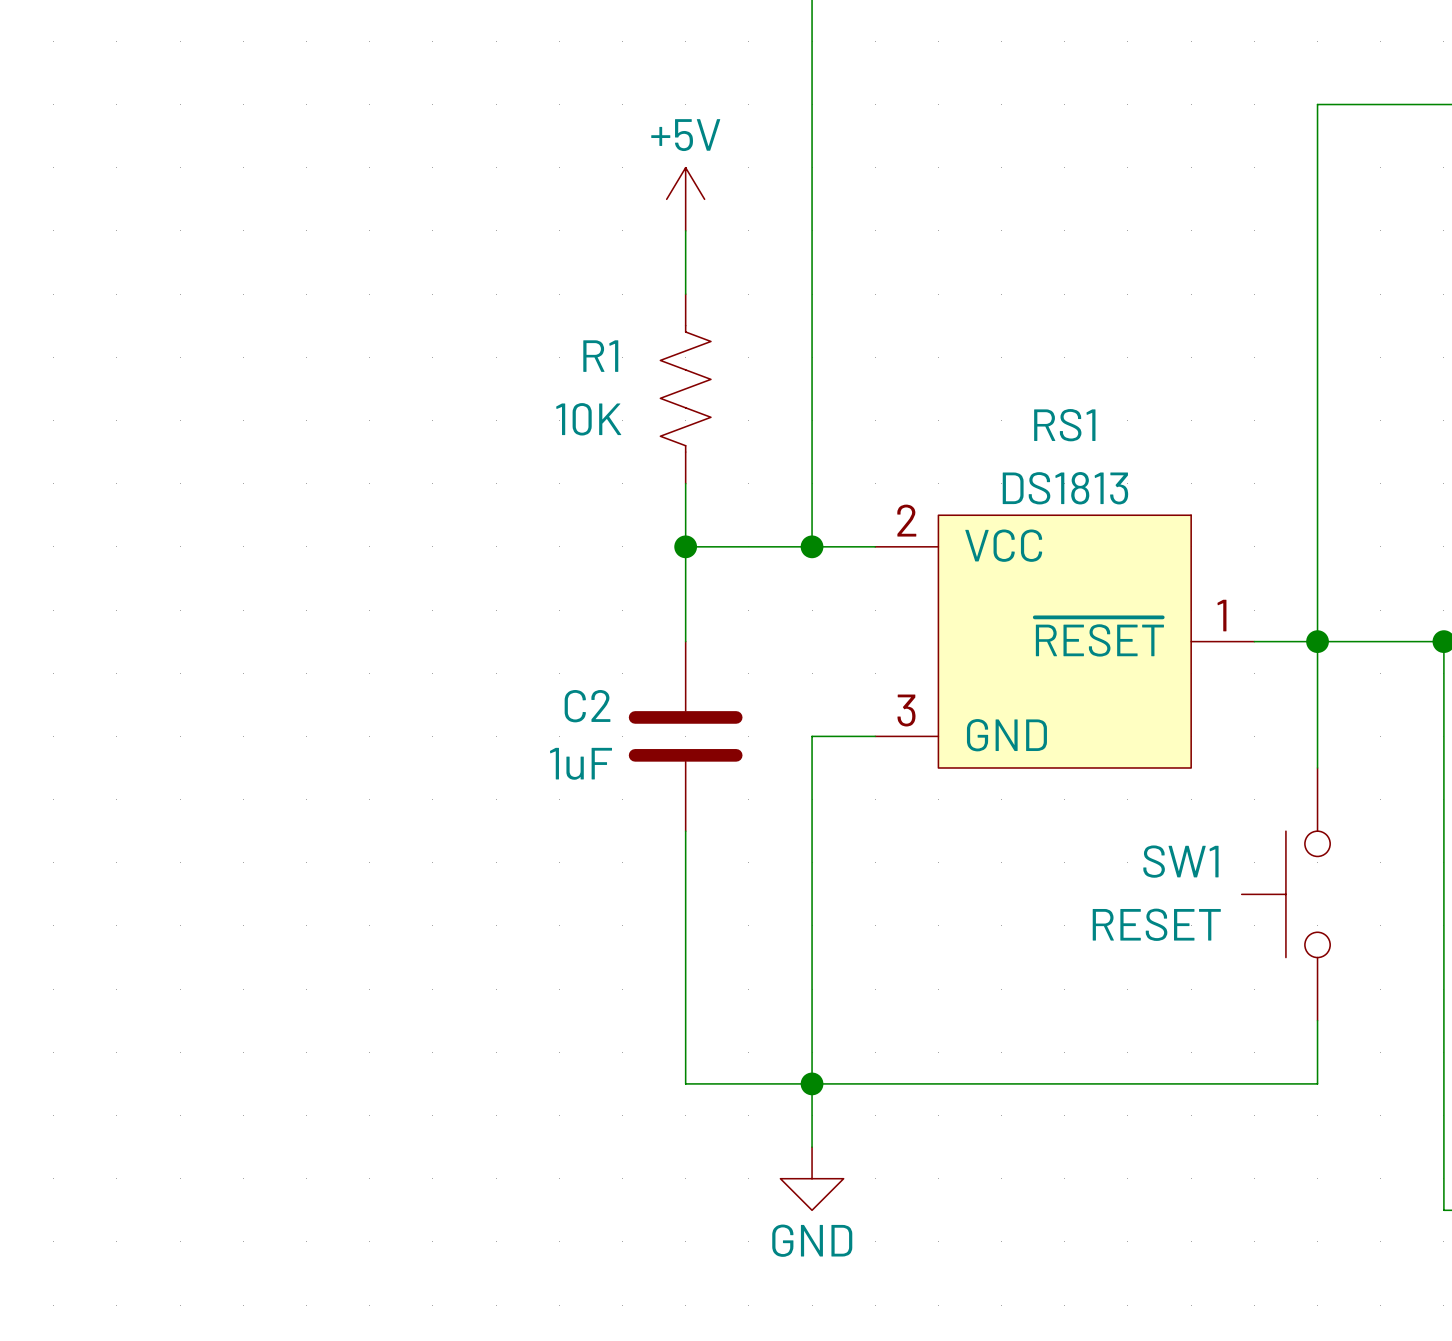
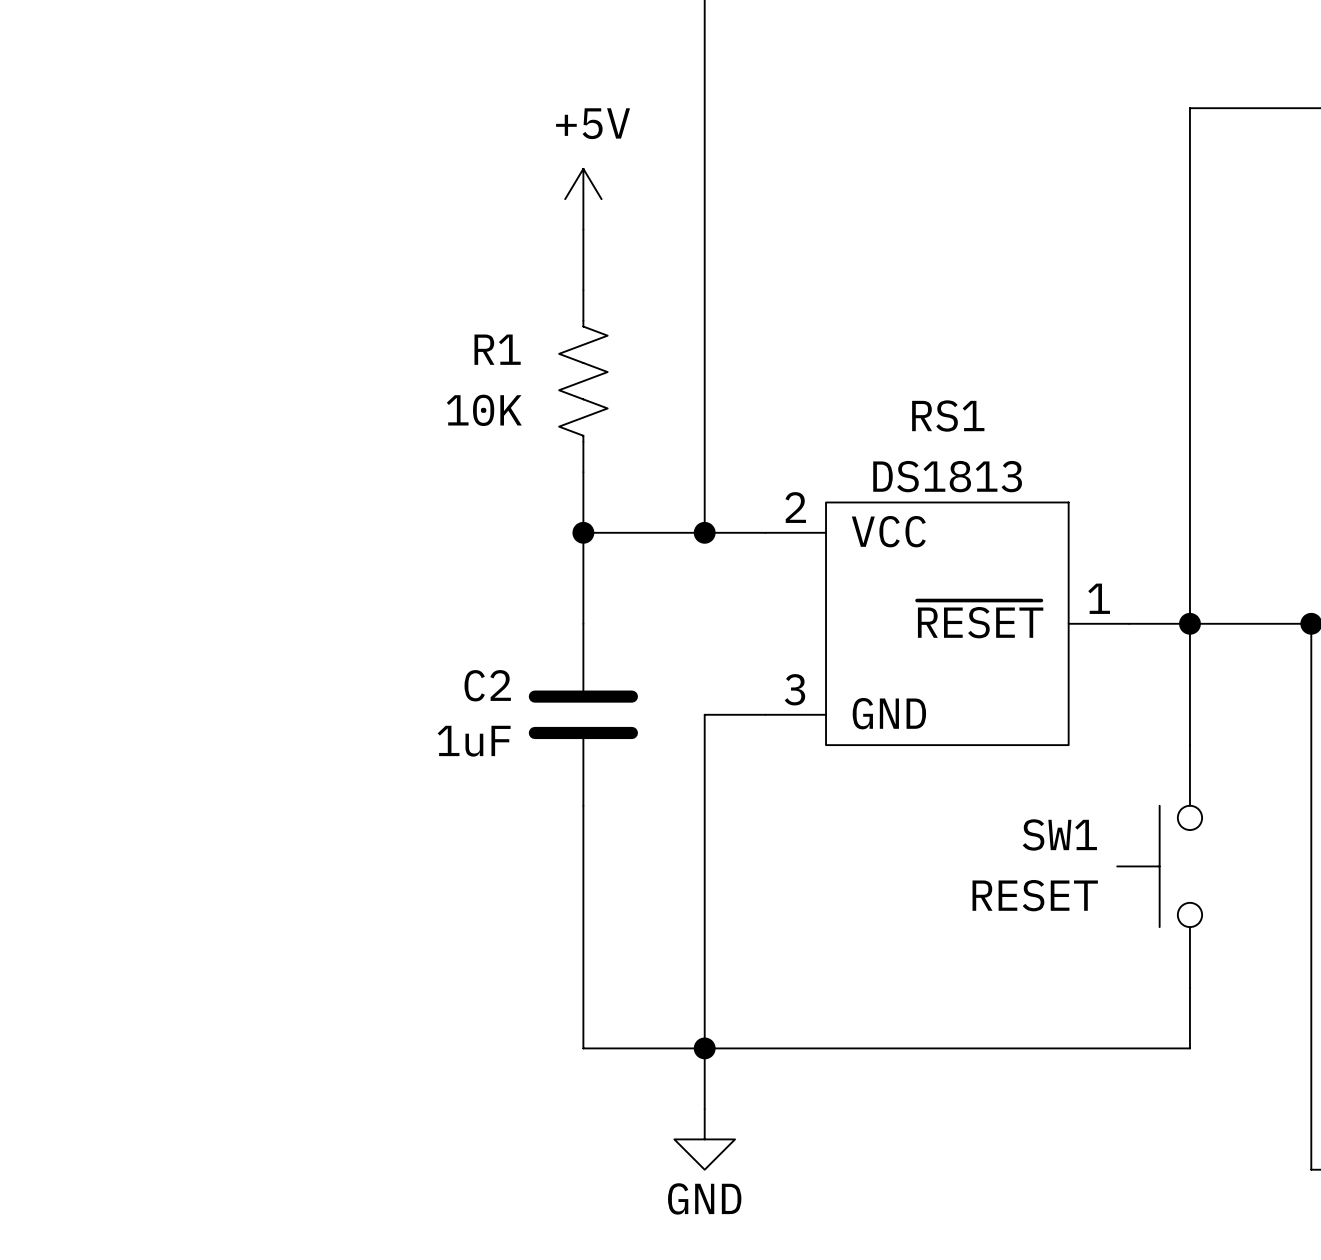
power symbol text position: +5V (685, 135) -> +5V (593, 123)

